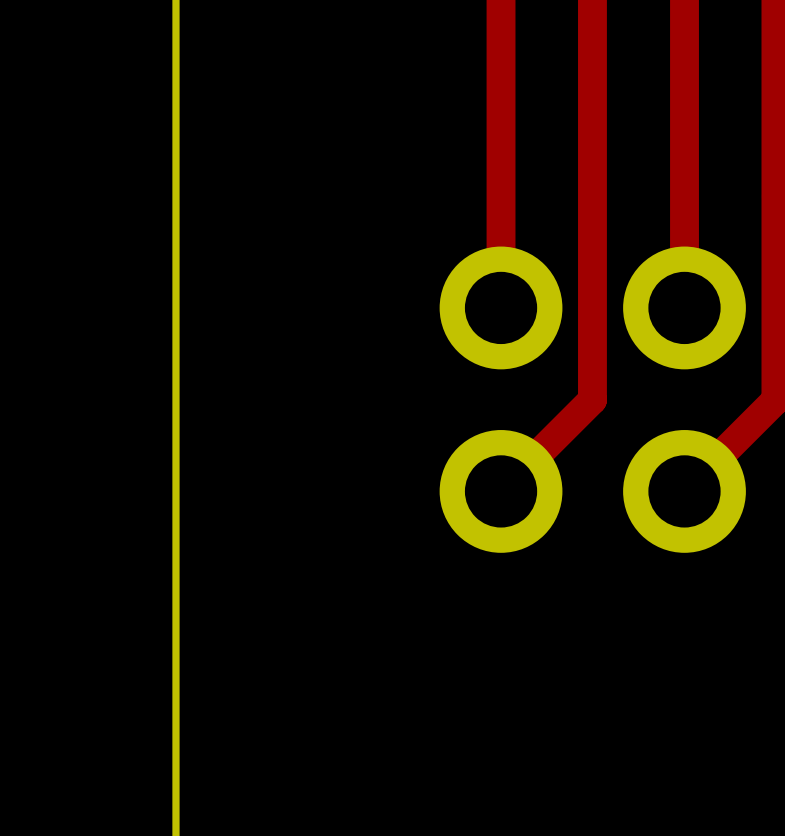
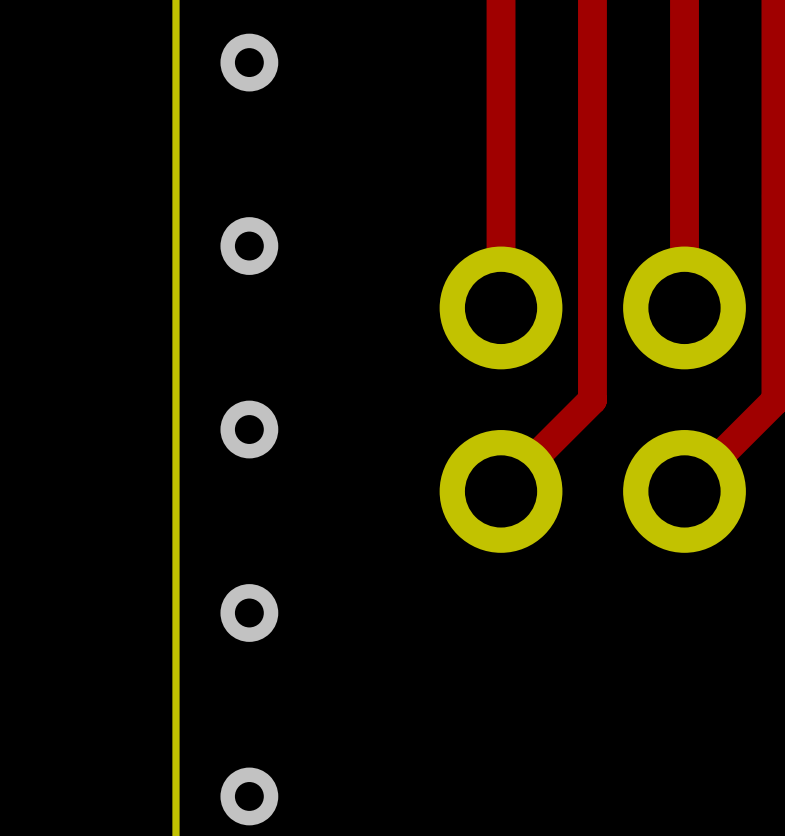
via: none -> (249, 62)
via: none -> (249, 246)
via: none -> (249, 429)
via: none -> (249, 612)
via: none -> (249, 796)

